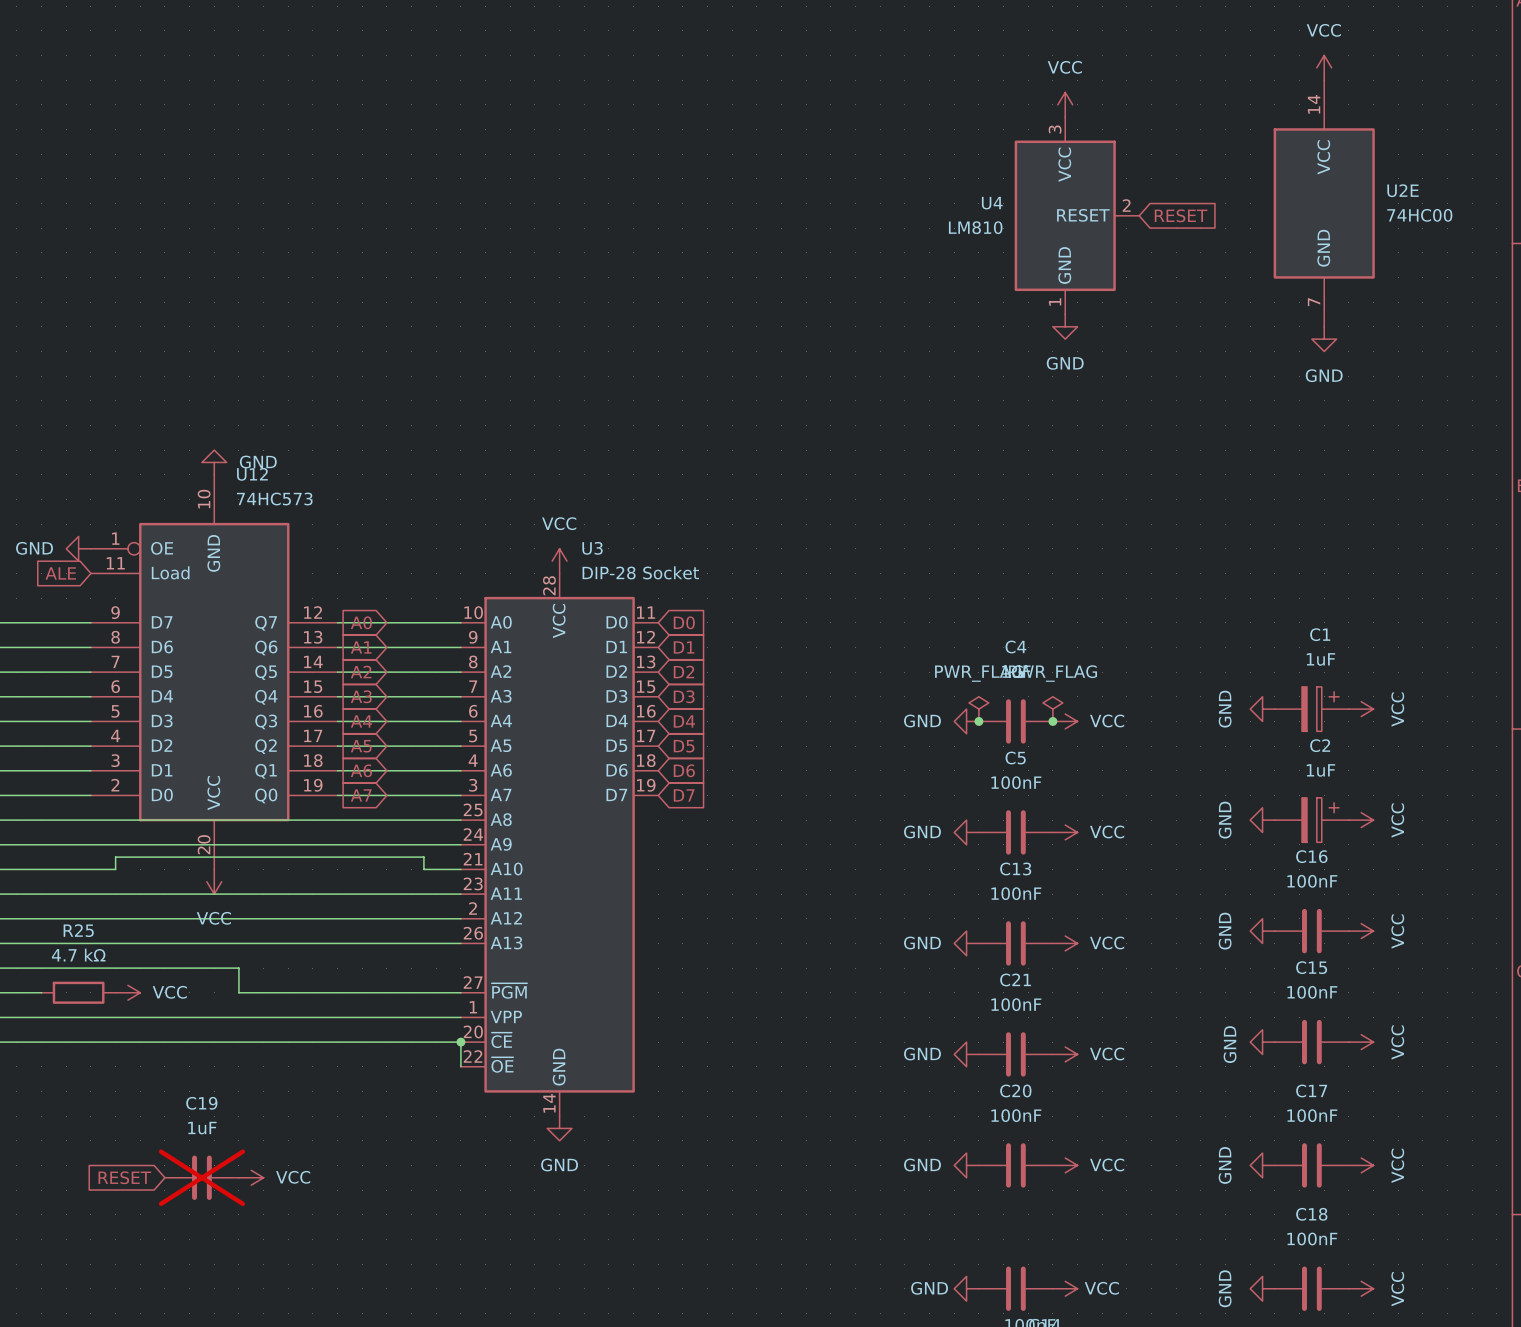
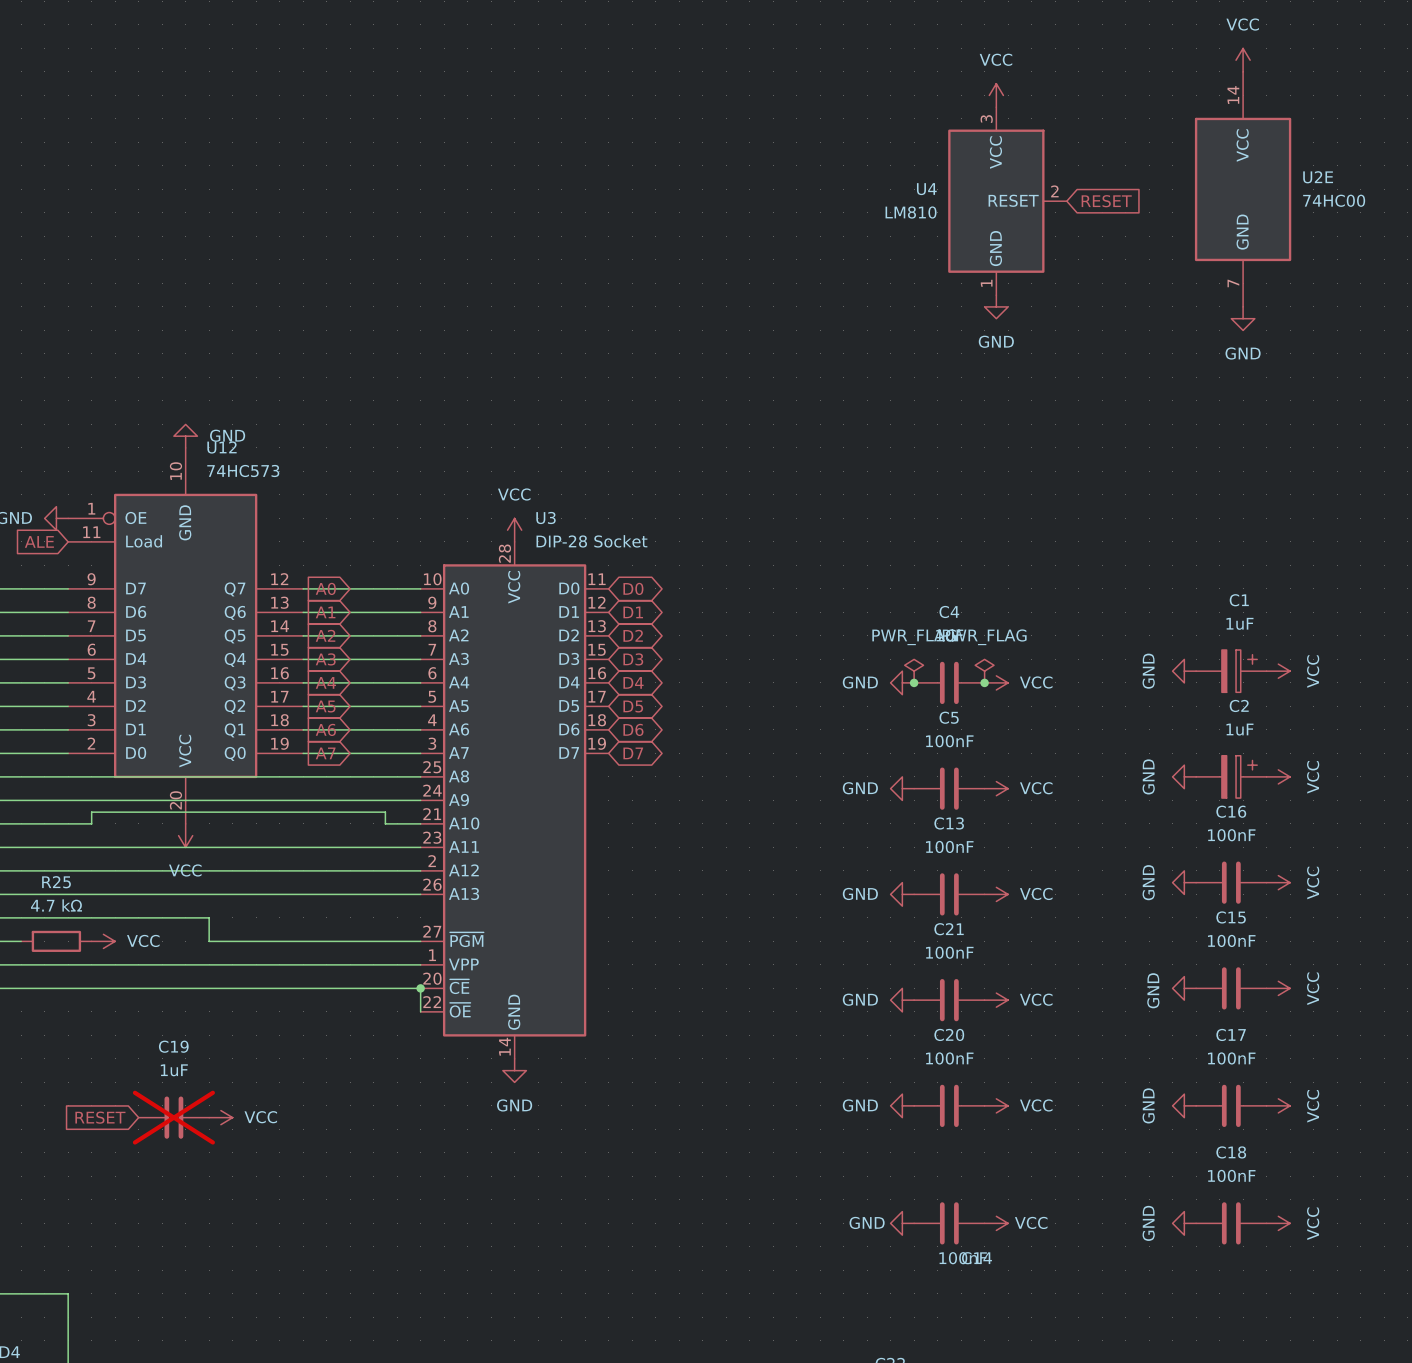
global label shape: input (684, 622) -> bidirectional (633, 588)
global label shape: input (684, 647) -> bidirectional (633, 612)
global label shape: input (684, 672) -> bidirectional (633, 635)
global label shape: input (684, 696) -> bidirectional (633, 659)
global label shape: input (684, 721) -> bidirectional (633, 682)
global label shape: input (684, 746) -> bidirectional (633, 706)
global label shape: input (684, 770) -> bidirectional (633, 729)
global label shape: input (684, 795) -> bidirectional (633, 753)

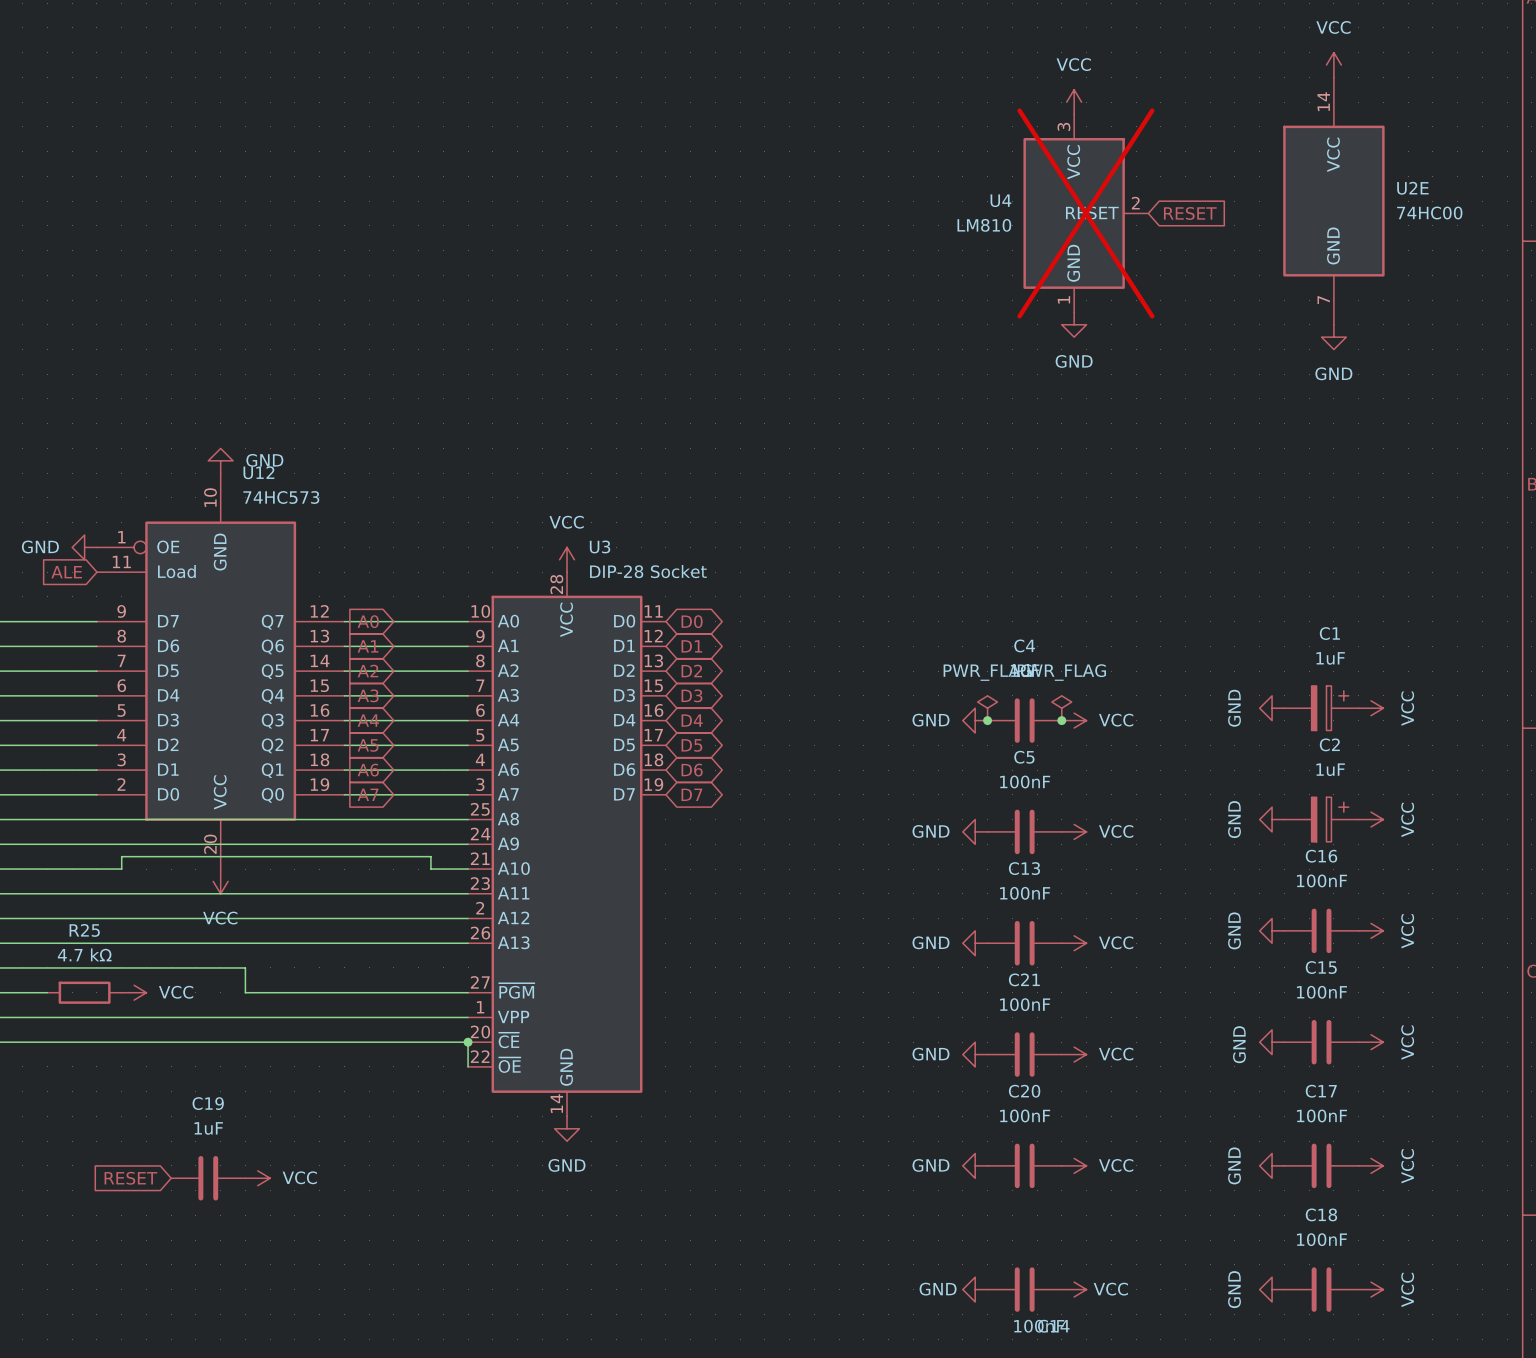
U4 do-not-place cross: none -> (1085, 213)
C19 do-not-place cross: (173, 1117) -> none

